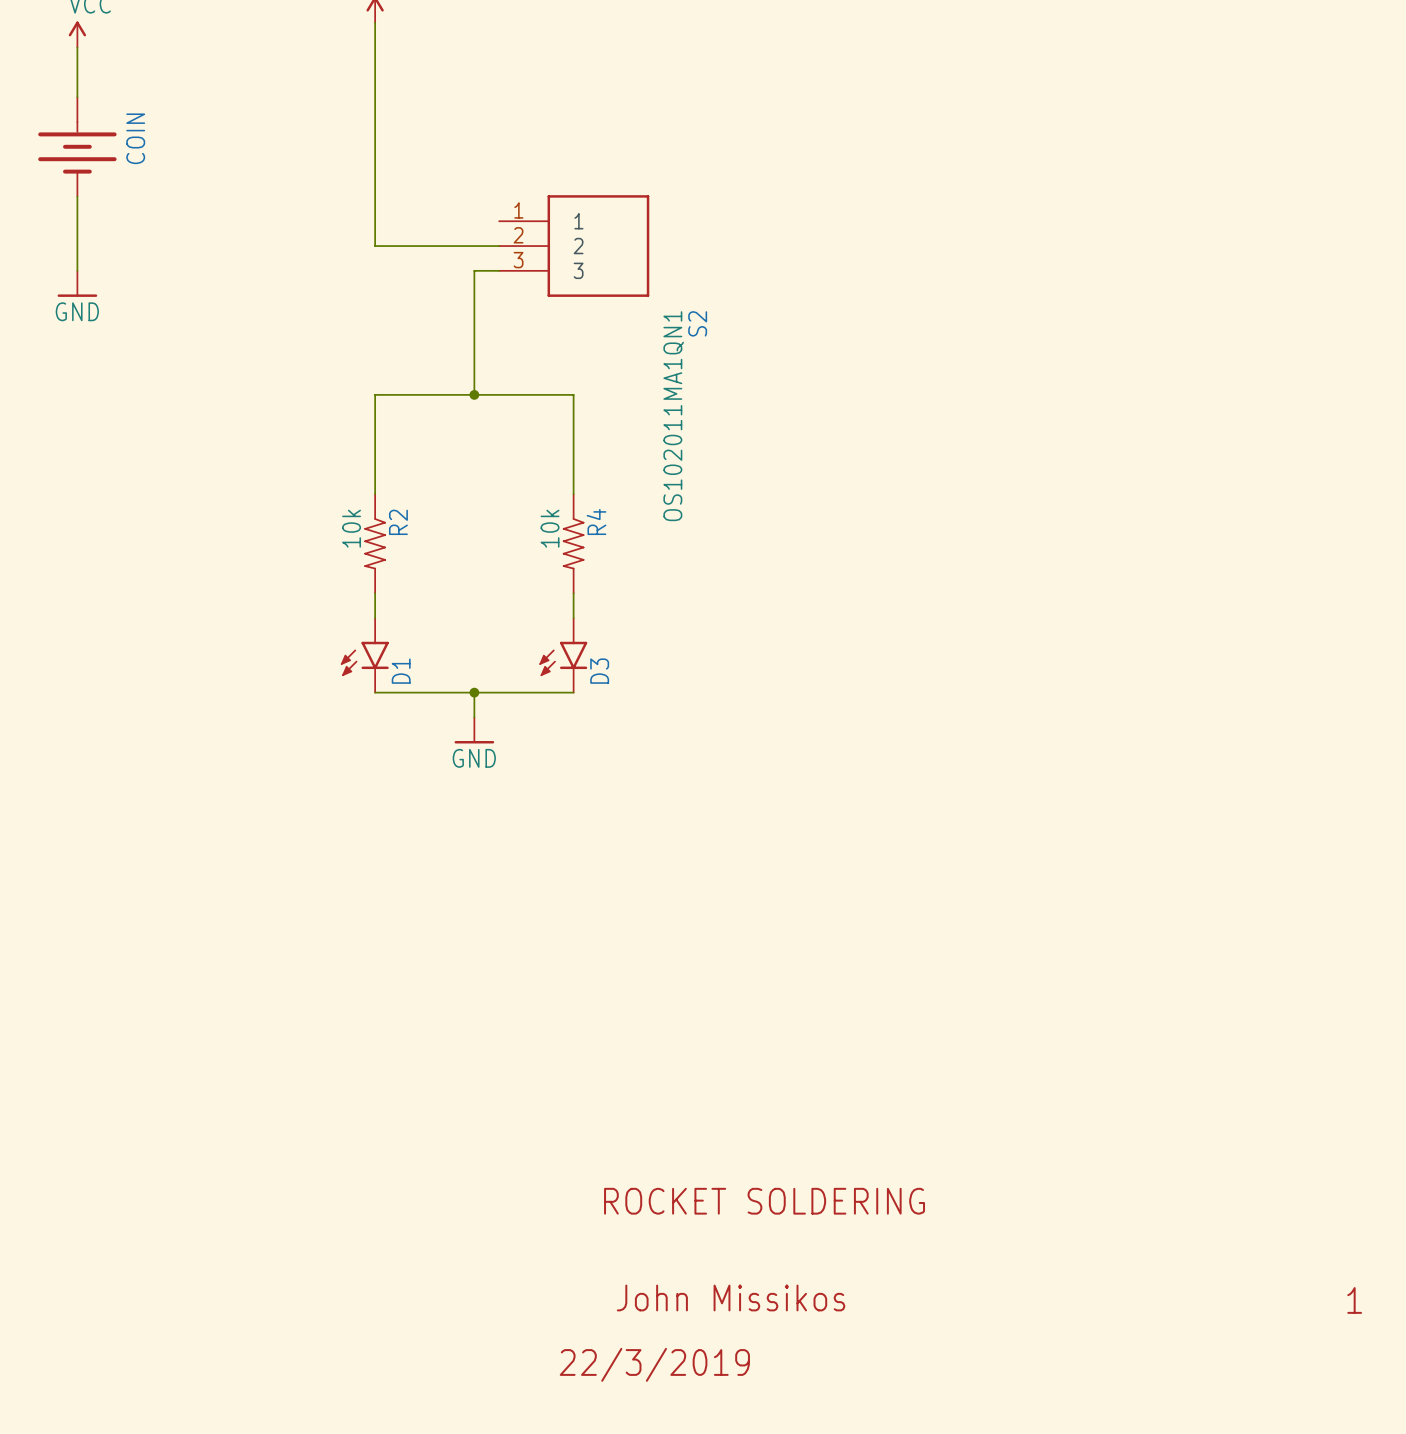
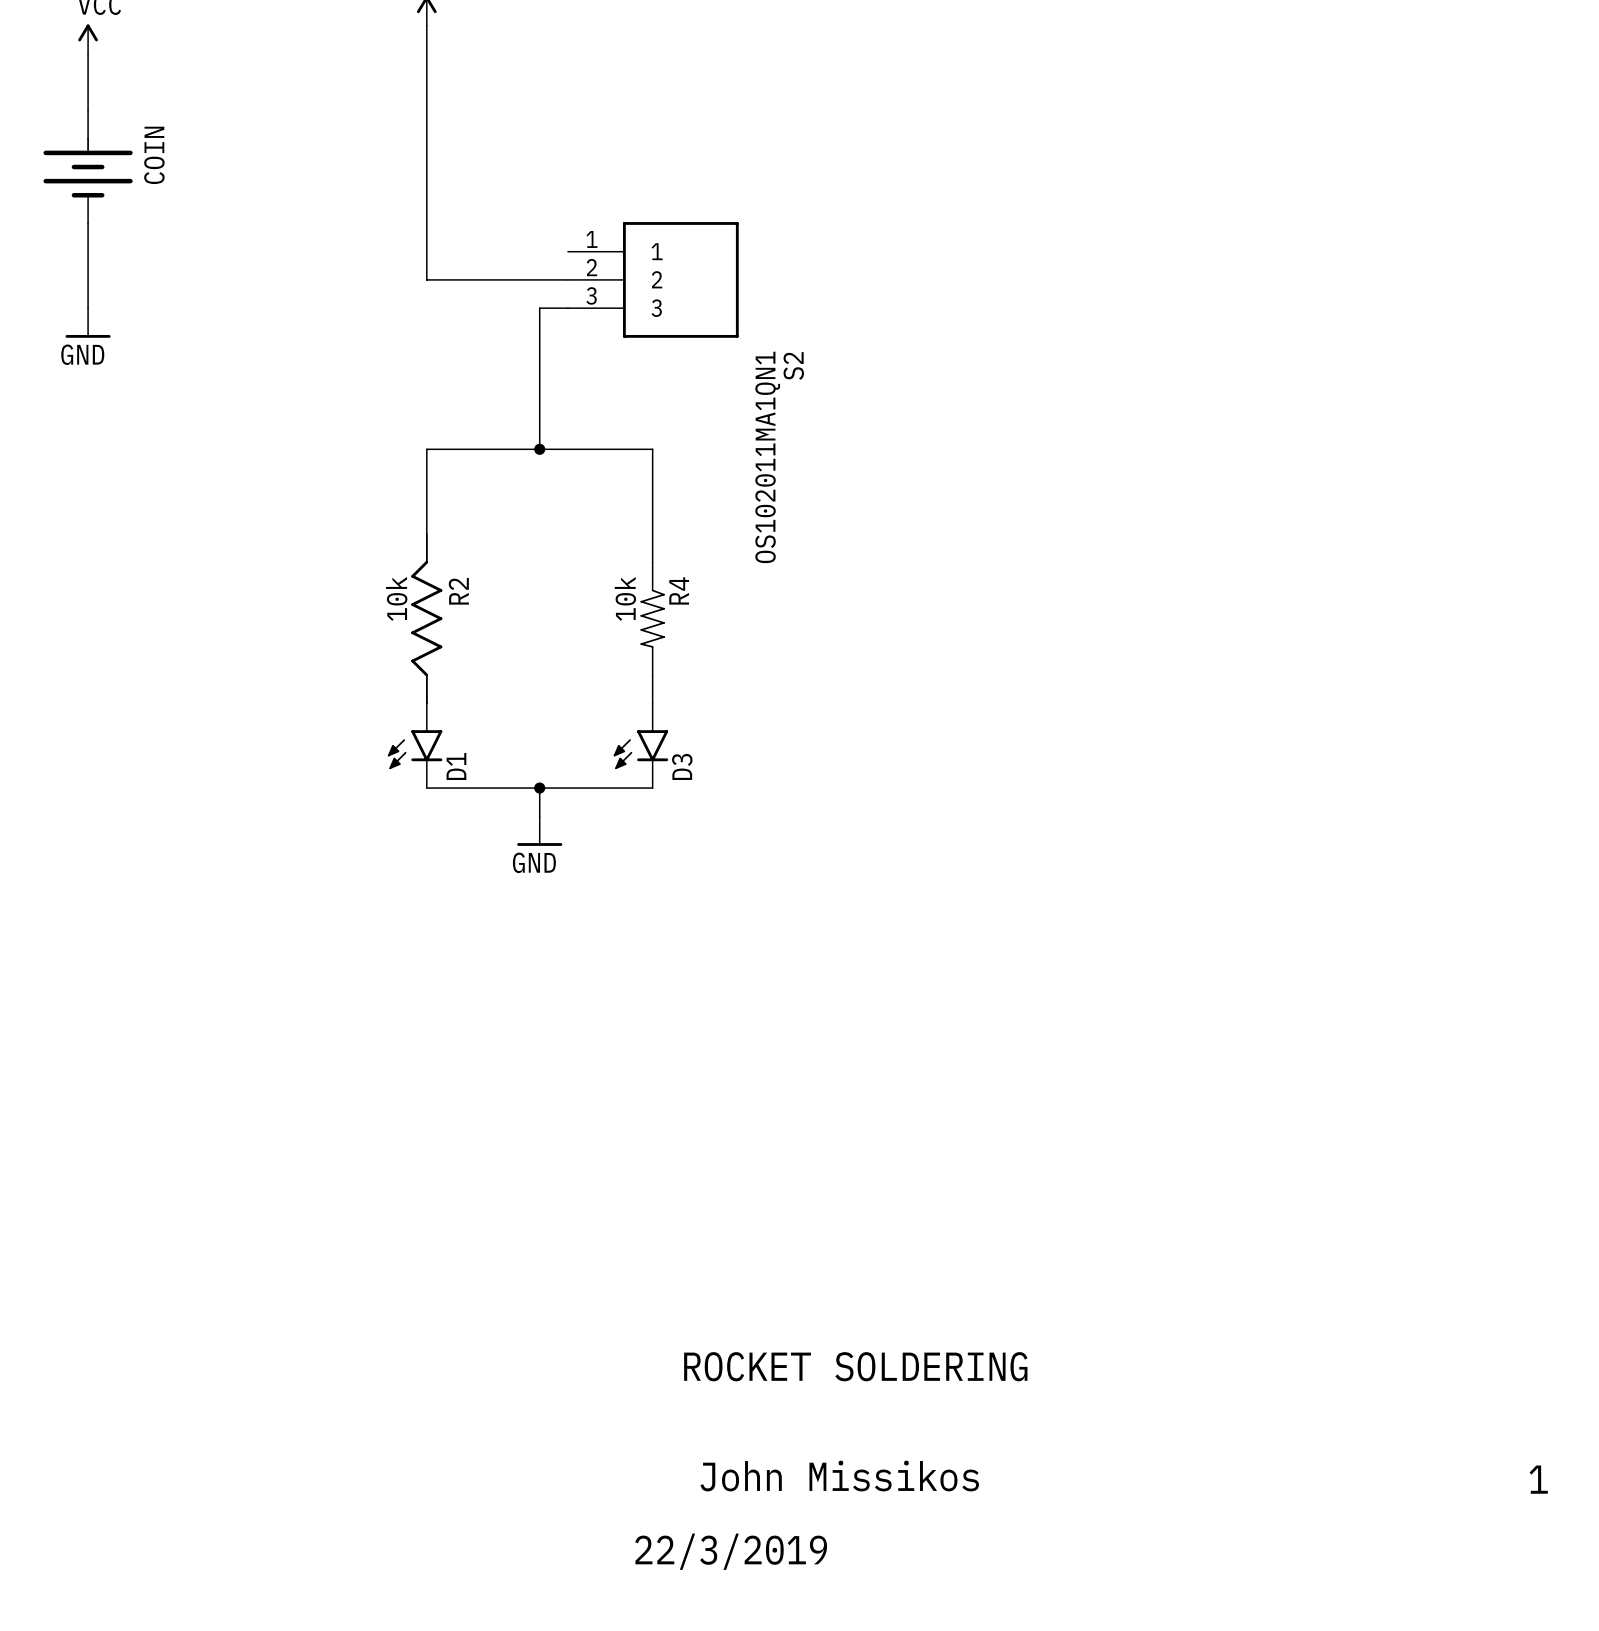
R2 symbol: [364, 494, 386, 594] -> [411, 533, 443, 704]

